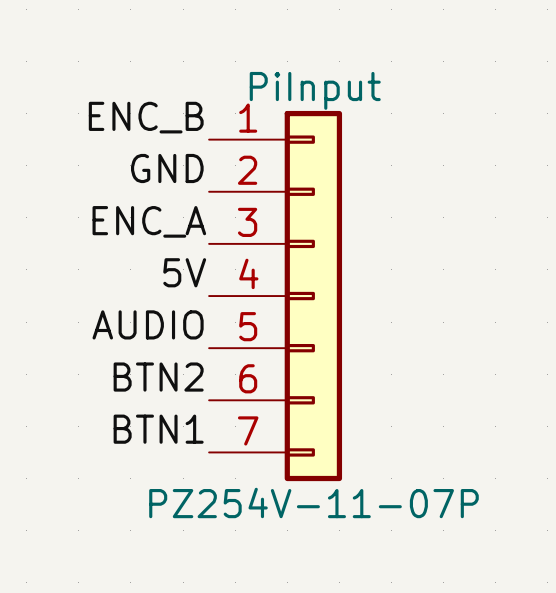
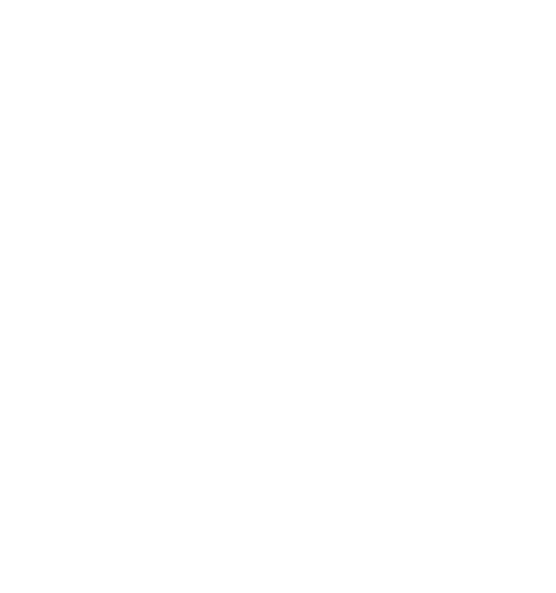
label: ENC_B (146, 117) -> none
label: GND (167, 168) -> none
label: ENC_A (149, 221) -> none
label: 5V (184, 272) -> none
PiInput: PZ254V-11-07P (275, 296) -> none
label: AUDIO (148, 324) -> none
label: BTN2 (158, 377) -> none
label: BTN1 (158, 429) -> none

